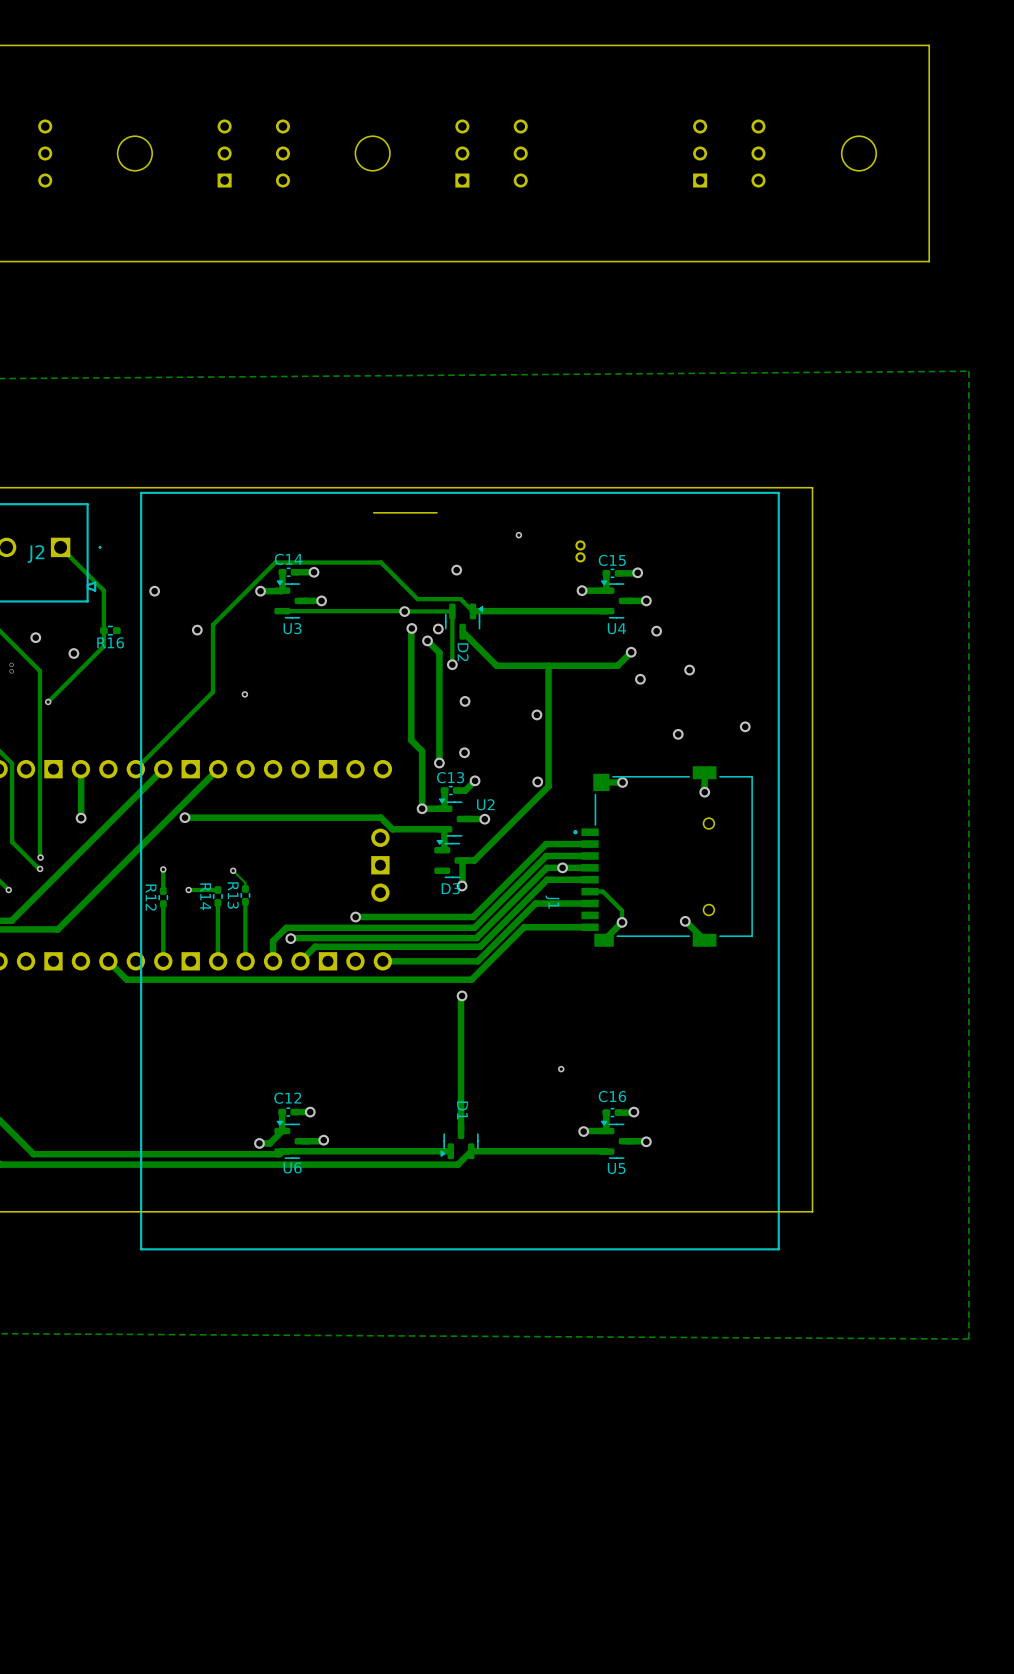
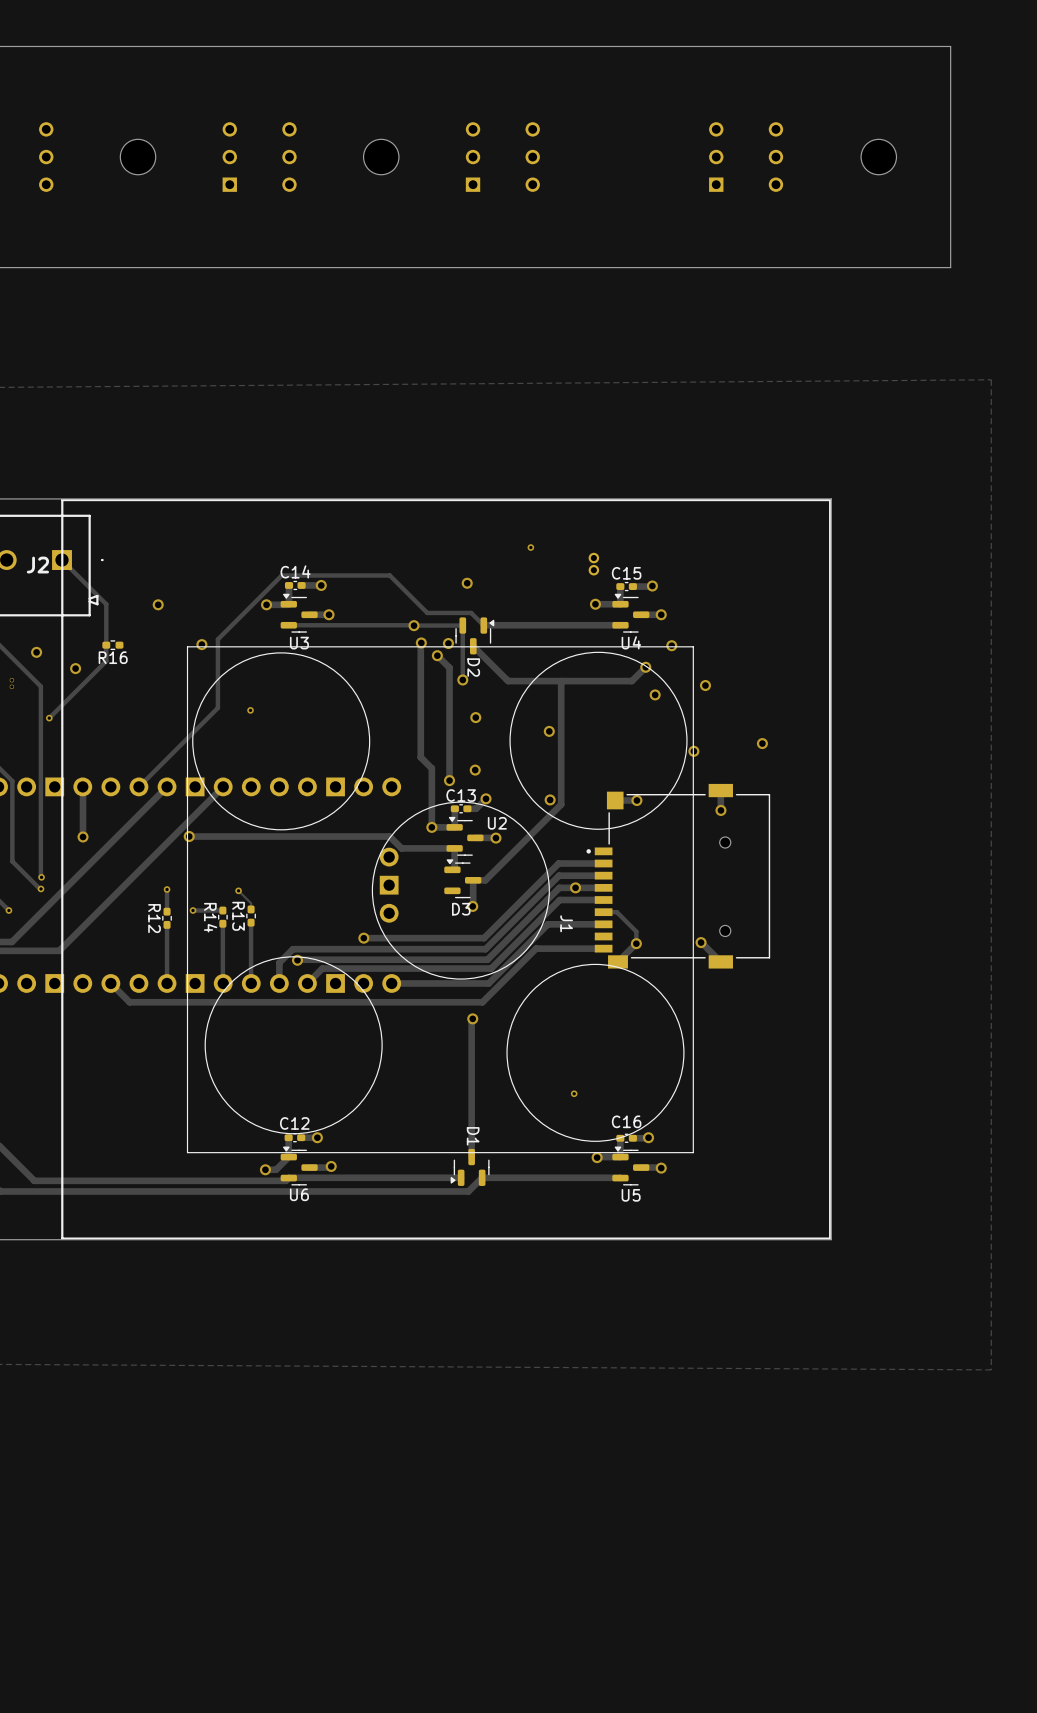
line: (778, 492) (141, 492) (141, 1249) (778, 1249) (778, 492) -> (830, 500) (830, 1238) (62, 1238) (62, 500) (830, 500)
board edge: (436, 512) (373, 512) -> none
line: none -> (693, 646) (187, 646) (187, 1152) (693, 1152) (693, 646)
drawing: none -> [192, 651, 688, 1142]

